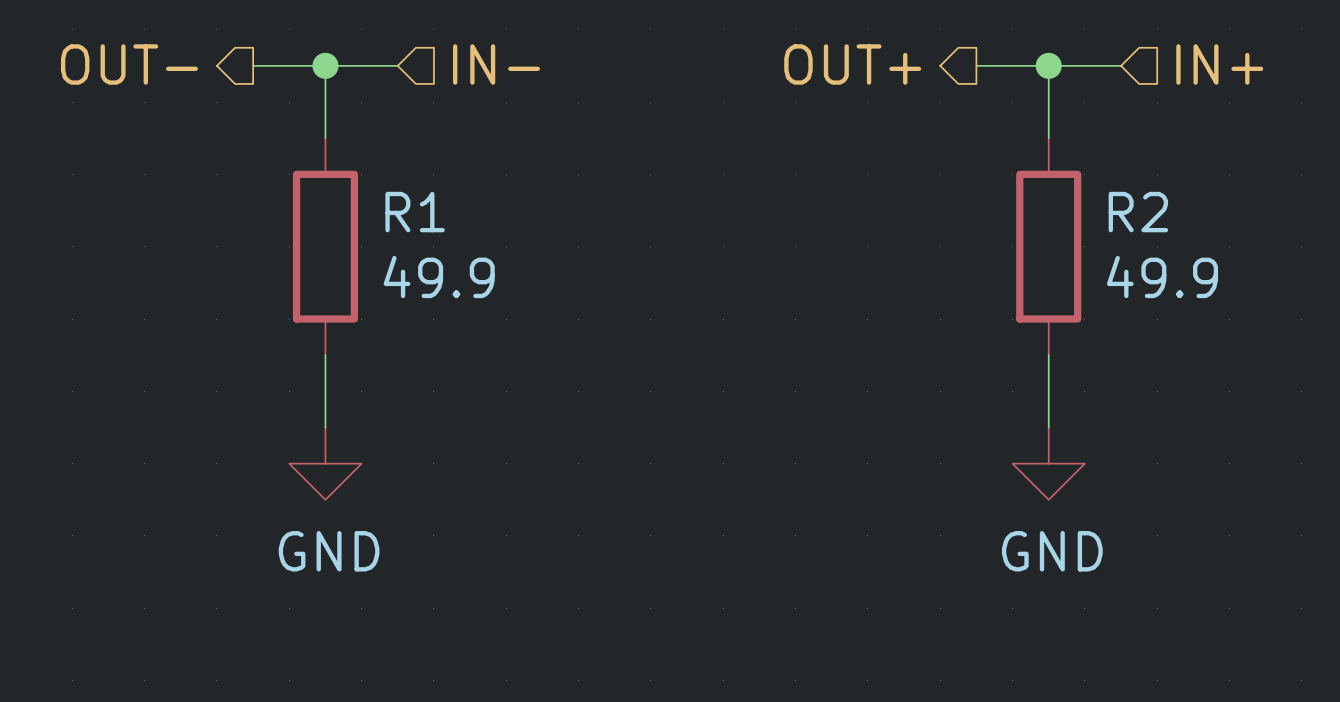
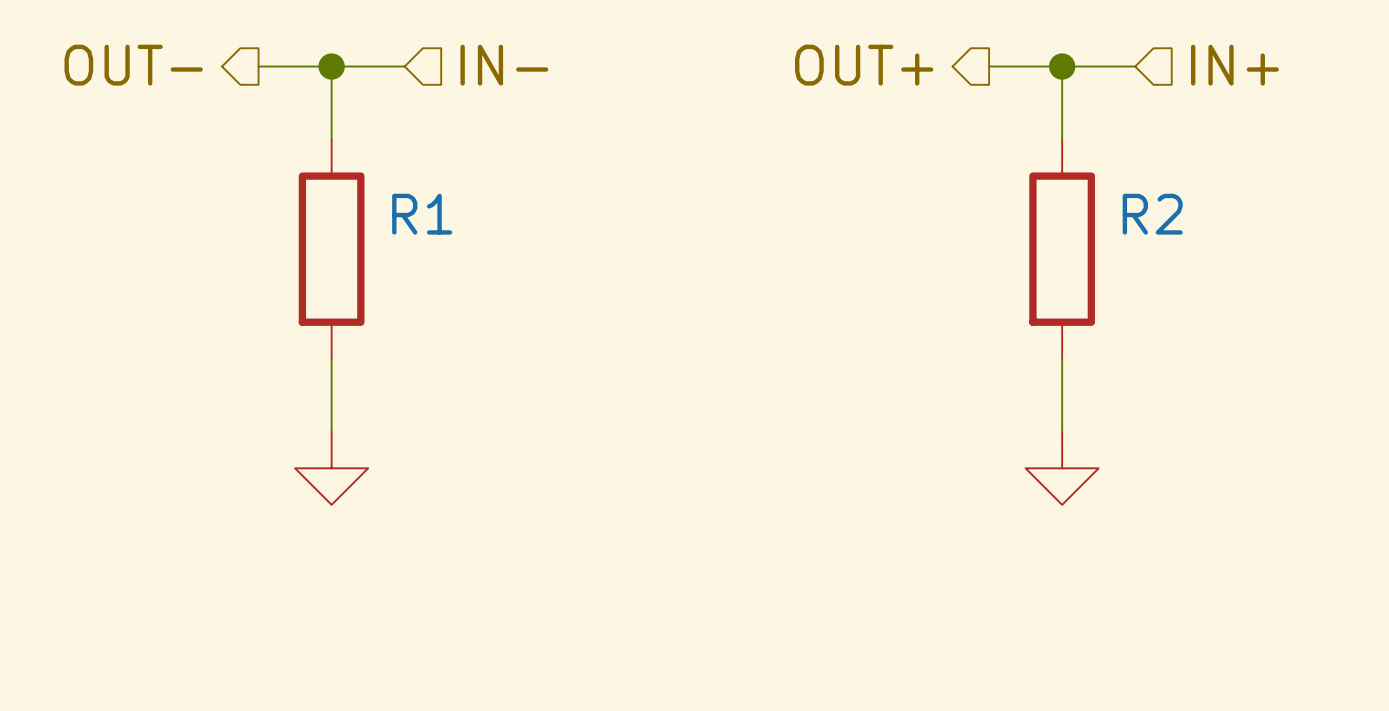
R1 value: 49.9 (439, 277) -> none
R2 value: 49.9 (1162, 277) -> none
power symbol text: GND (329, 551) -> none
power symbol text: GND (1052, 551) -> none

